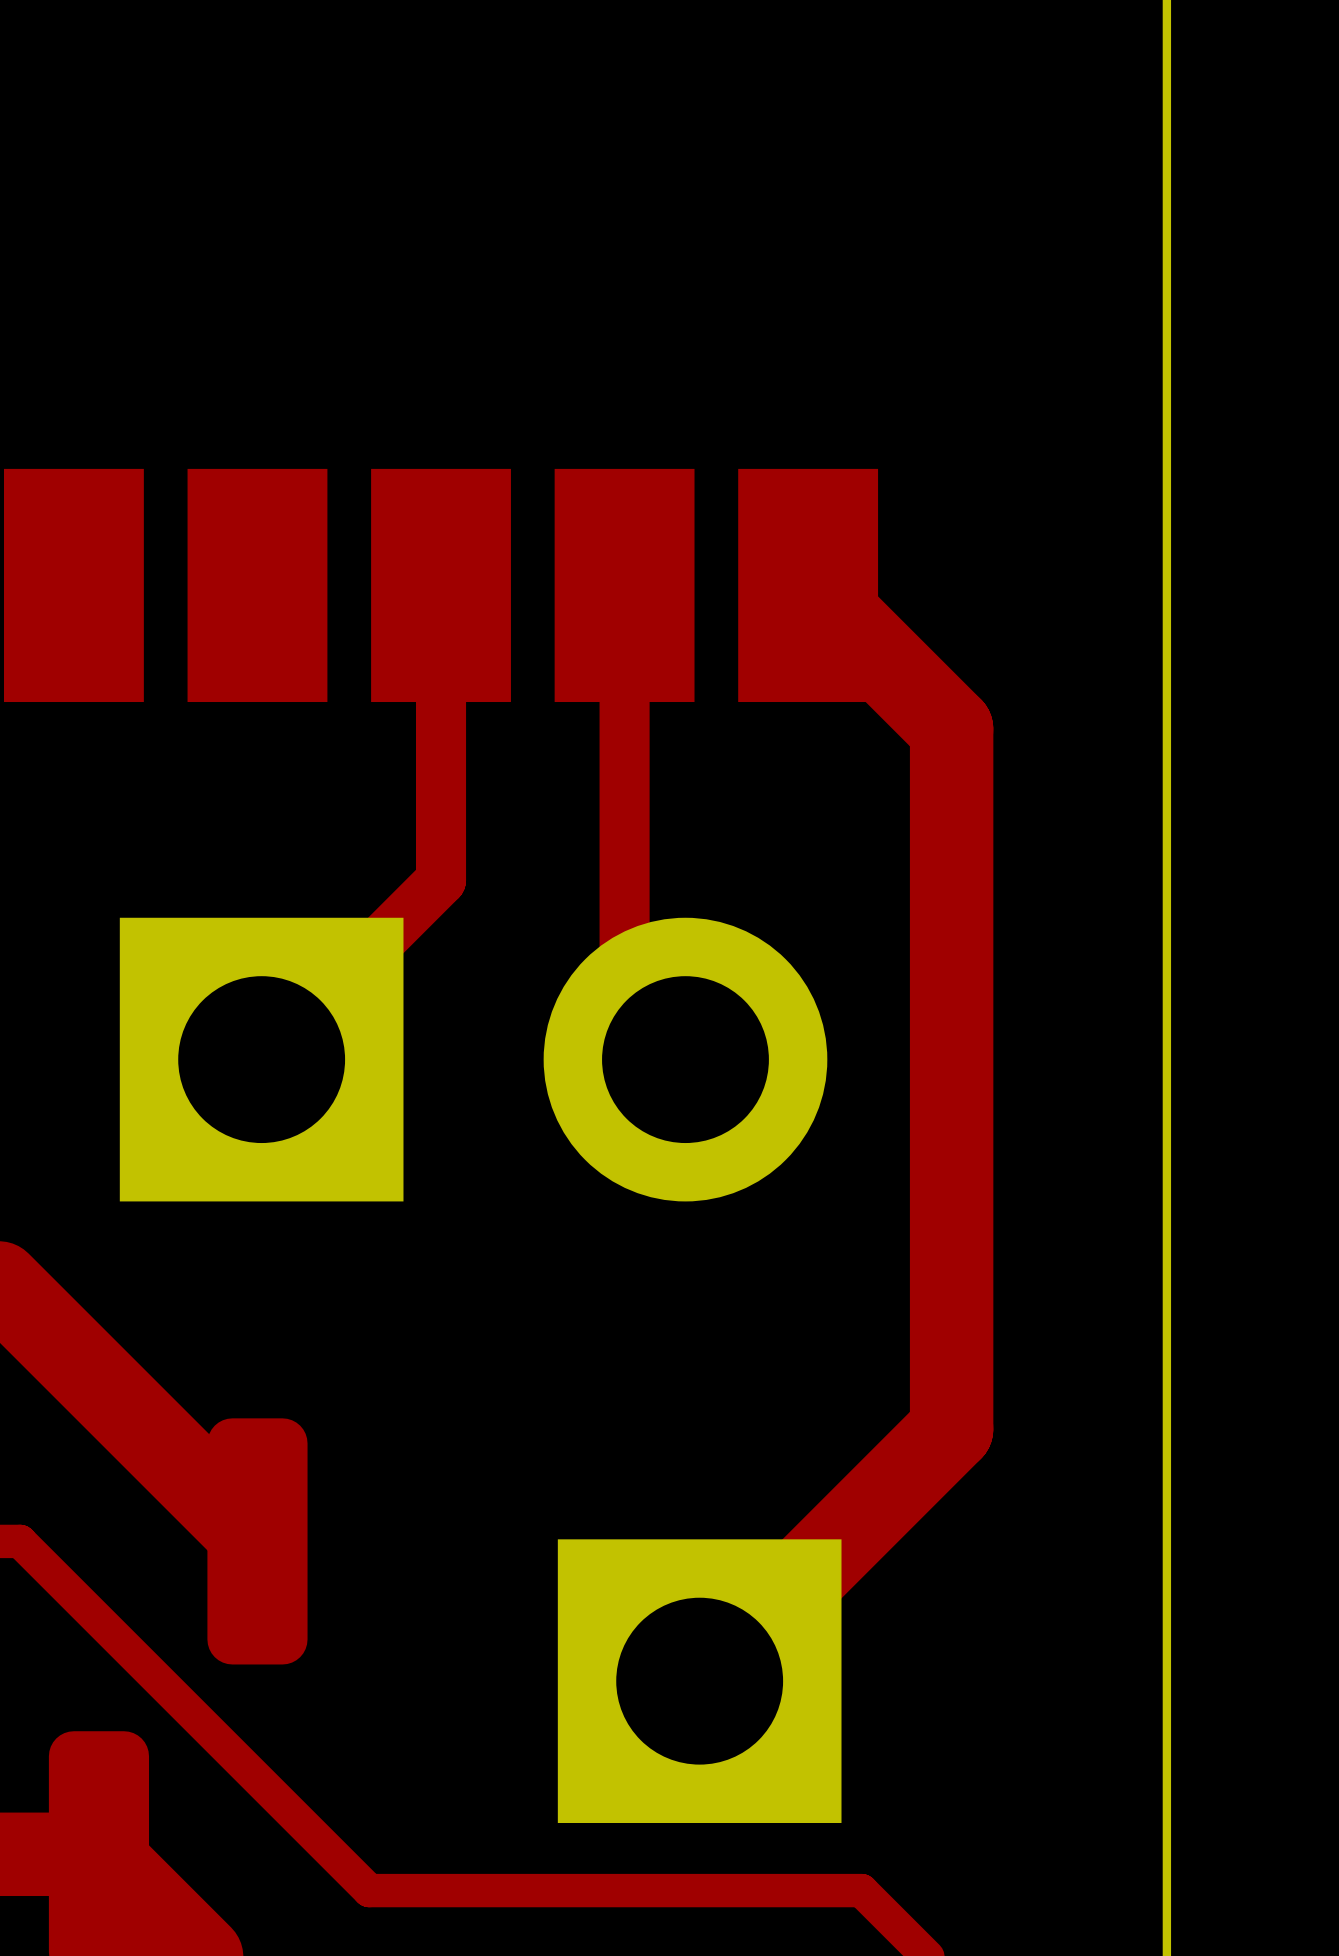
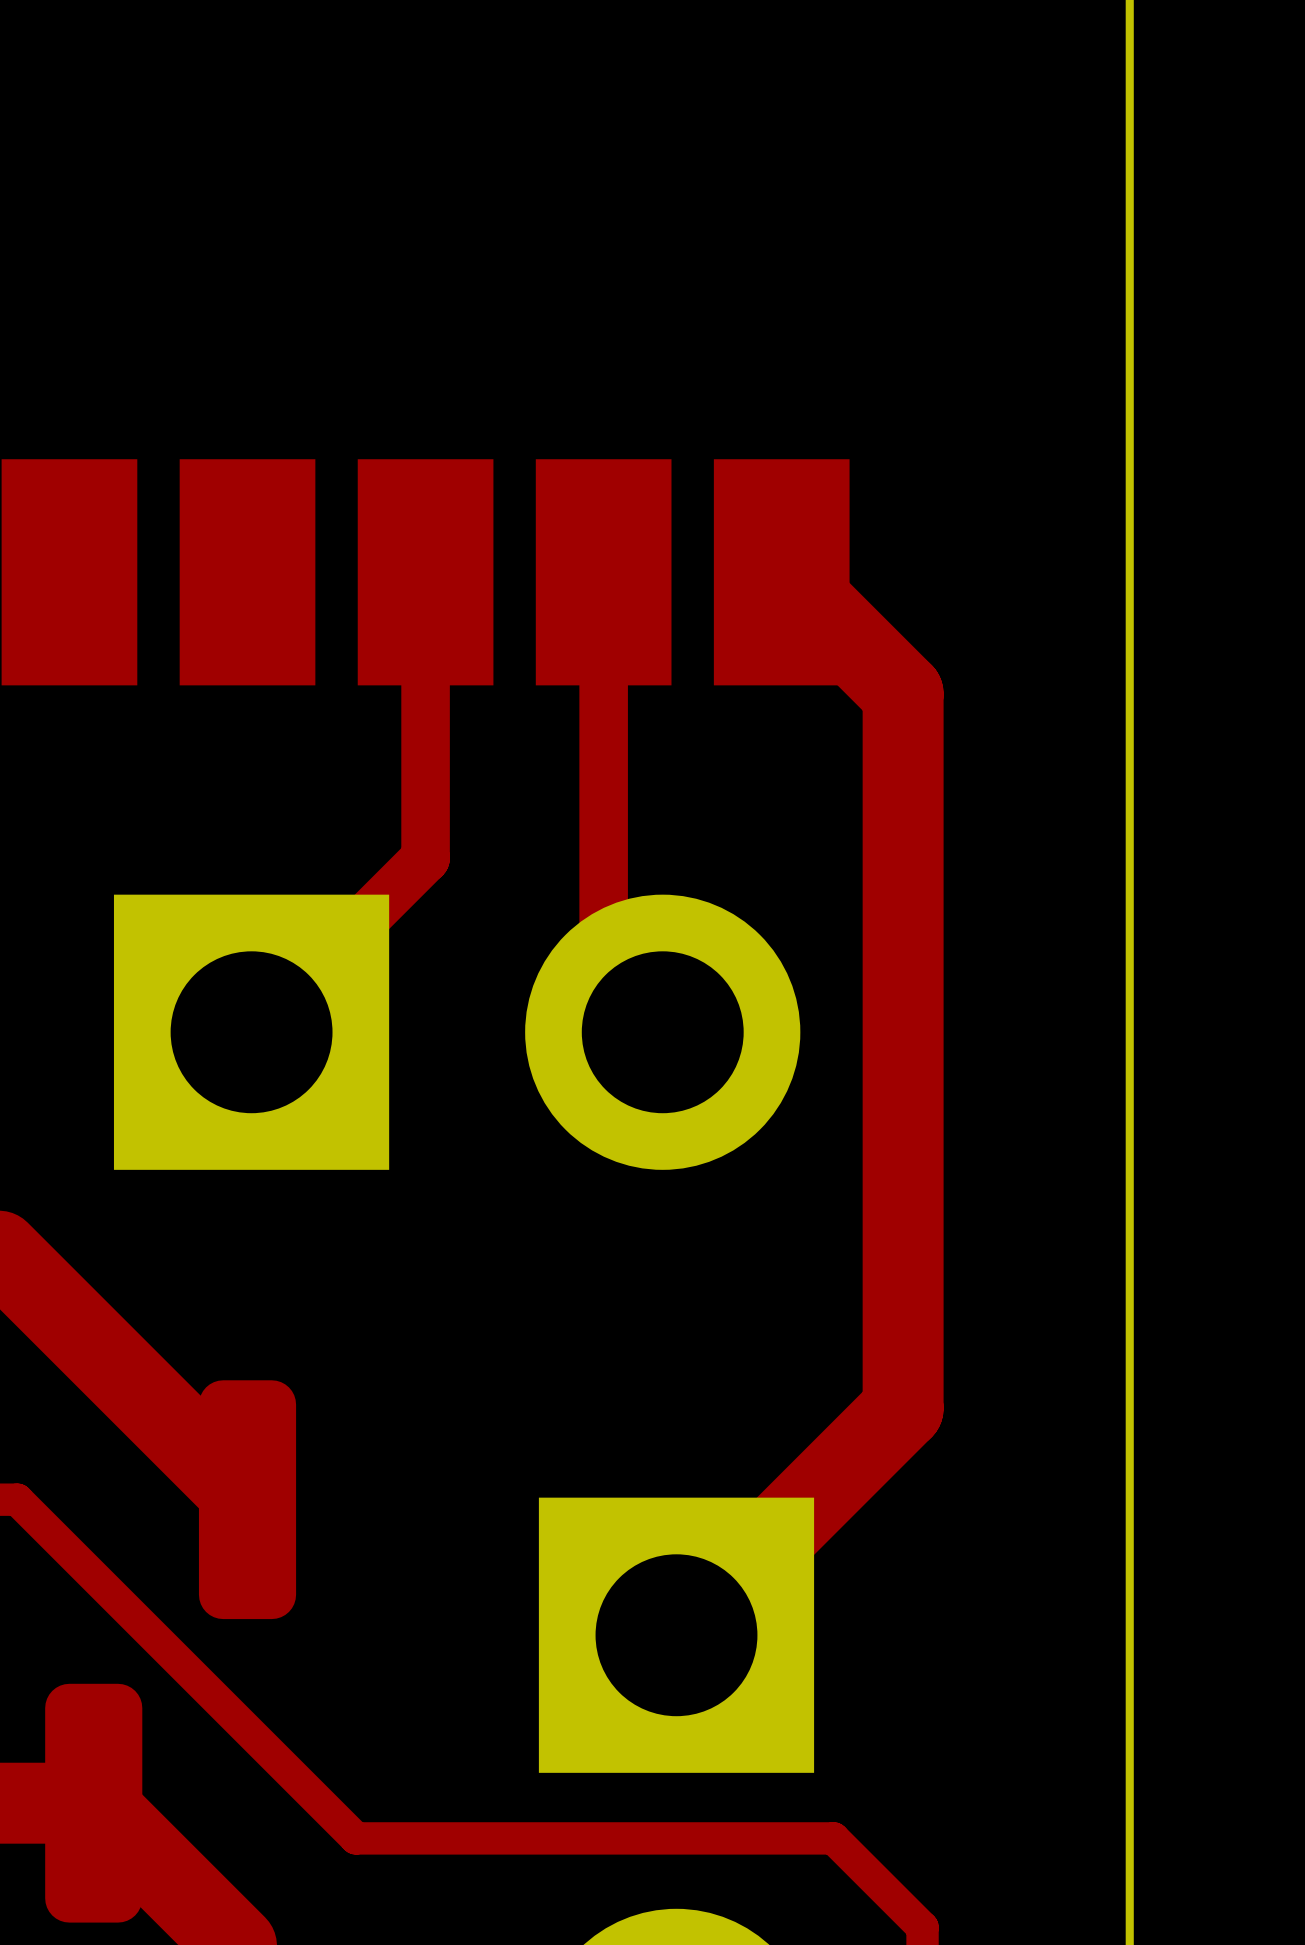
top track: (933, 710) (951, 728) (951, 1429) (933, 1447) -> (903, 693) (903, 1408)

